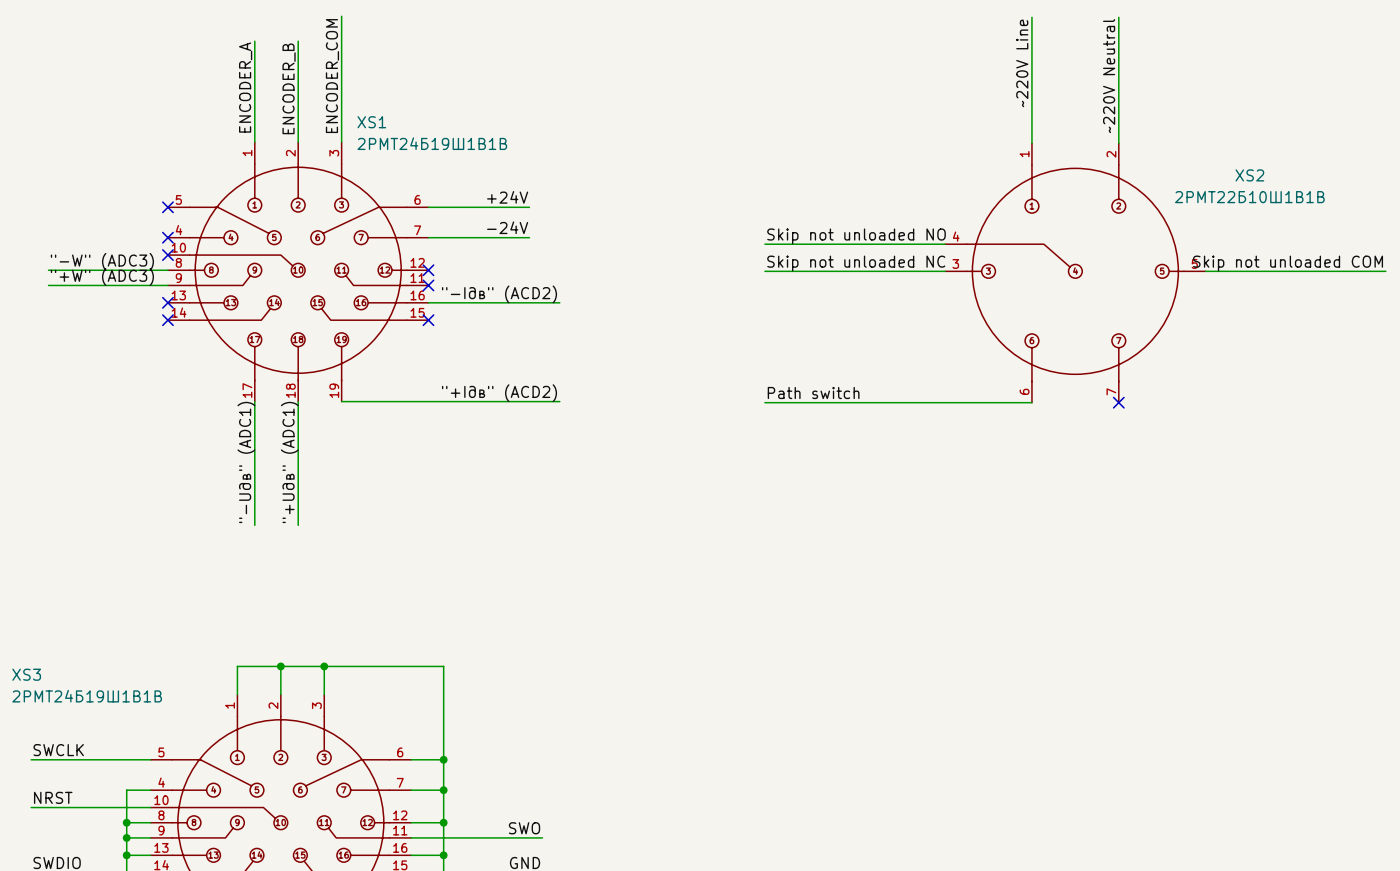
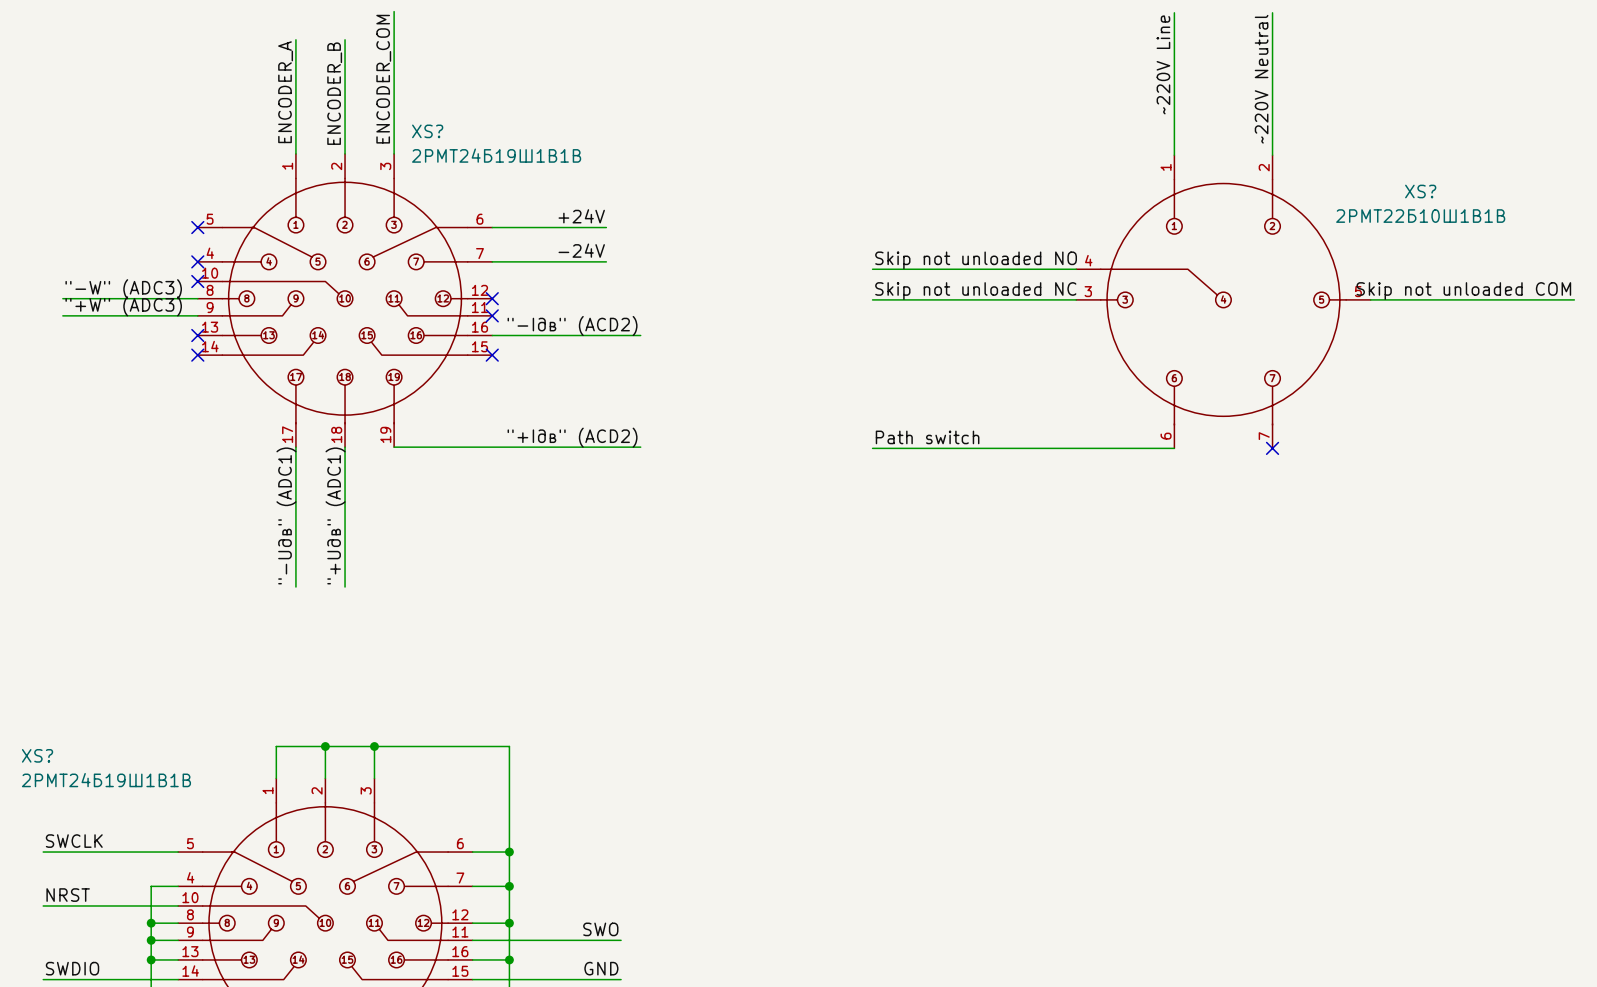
XS1 name: XS1 (371, 122) -> XS? (427, 131)
XS2 name: XS2 (1249, 175) -> XS? (1420, 191)
XS3 name: XS3 (26, 674) -> XS? (37, 755)

